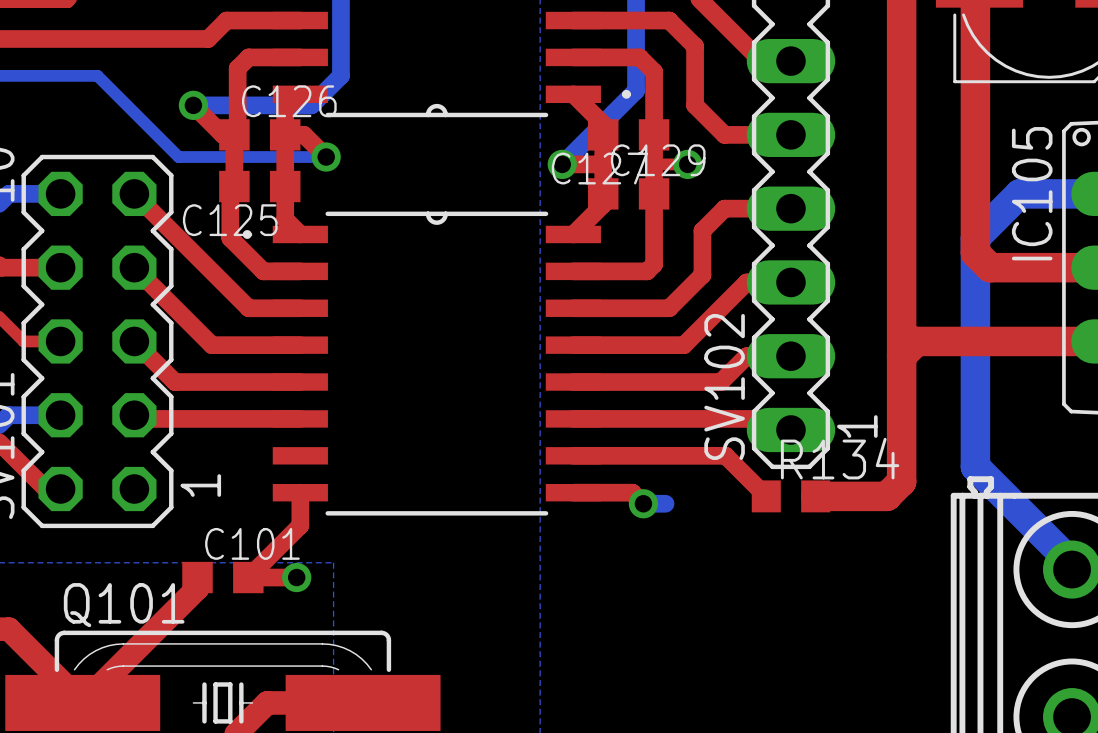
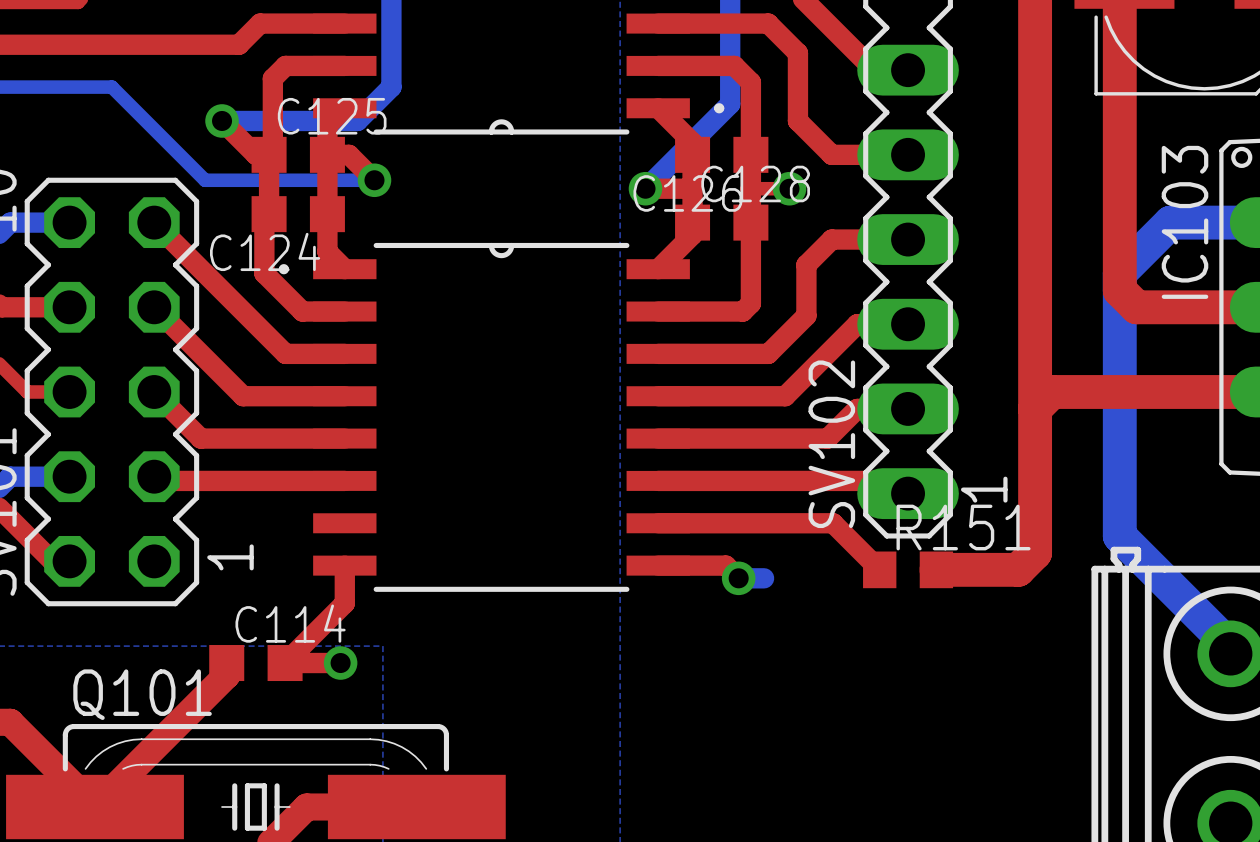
C126 name: C126 (289, 101) -> C125 (332, 116)
C129 name: C129 (658, 160) -> C128 (755, 183)
C127 name: C127 (599, 168) -> C126 (687, 193)
IC105 name: IC105 (1032, 193) -> IC103 (1185, 222)
C125 name: C125 (230, 220) -> C124 (265, 251)
R134 name: R134 (840, 458) -> R151 (963, 527)
C101 name: C101 (252, 543) -> C114 (290, 623)

